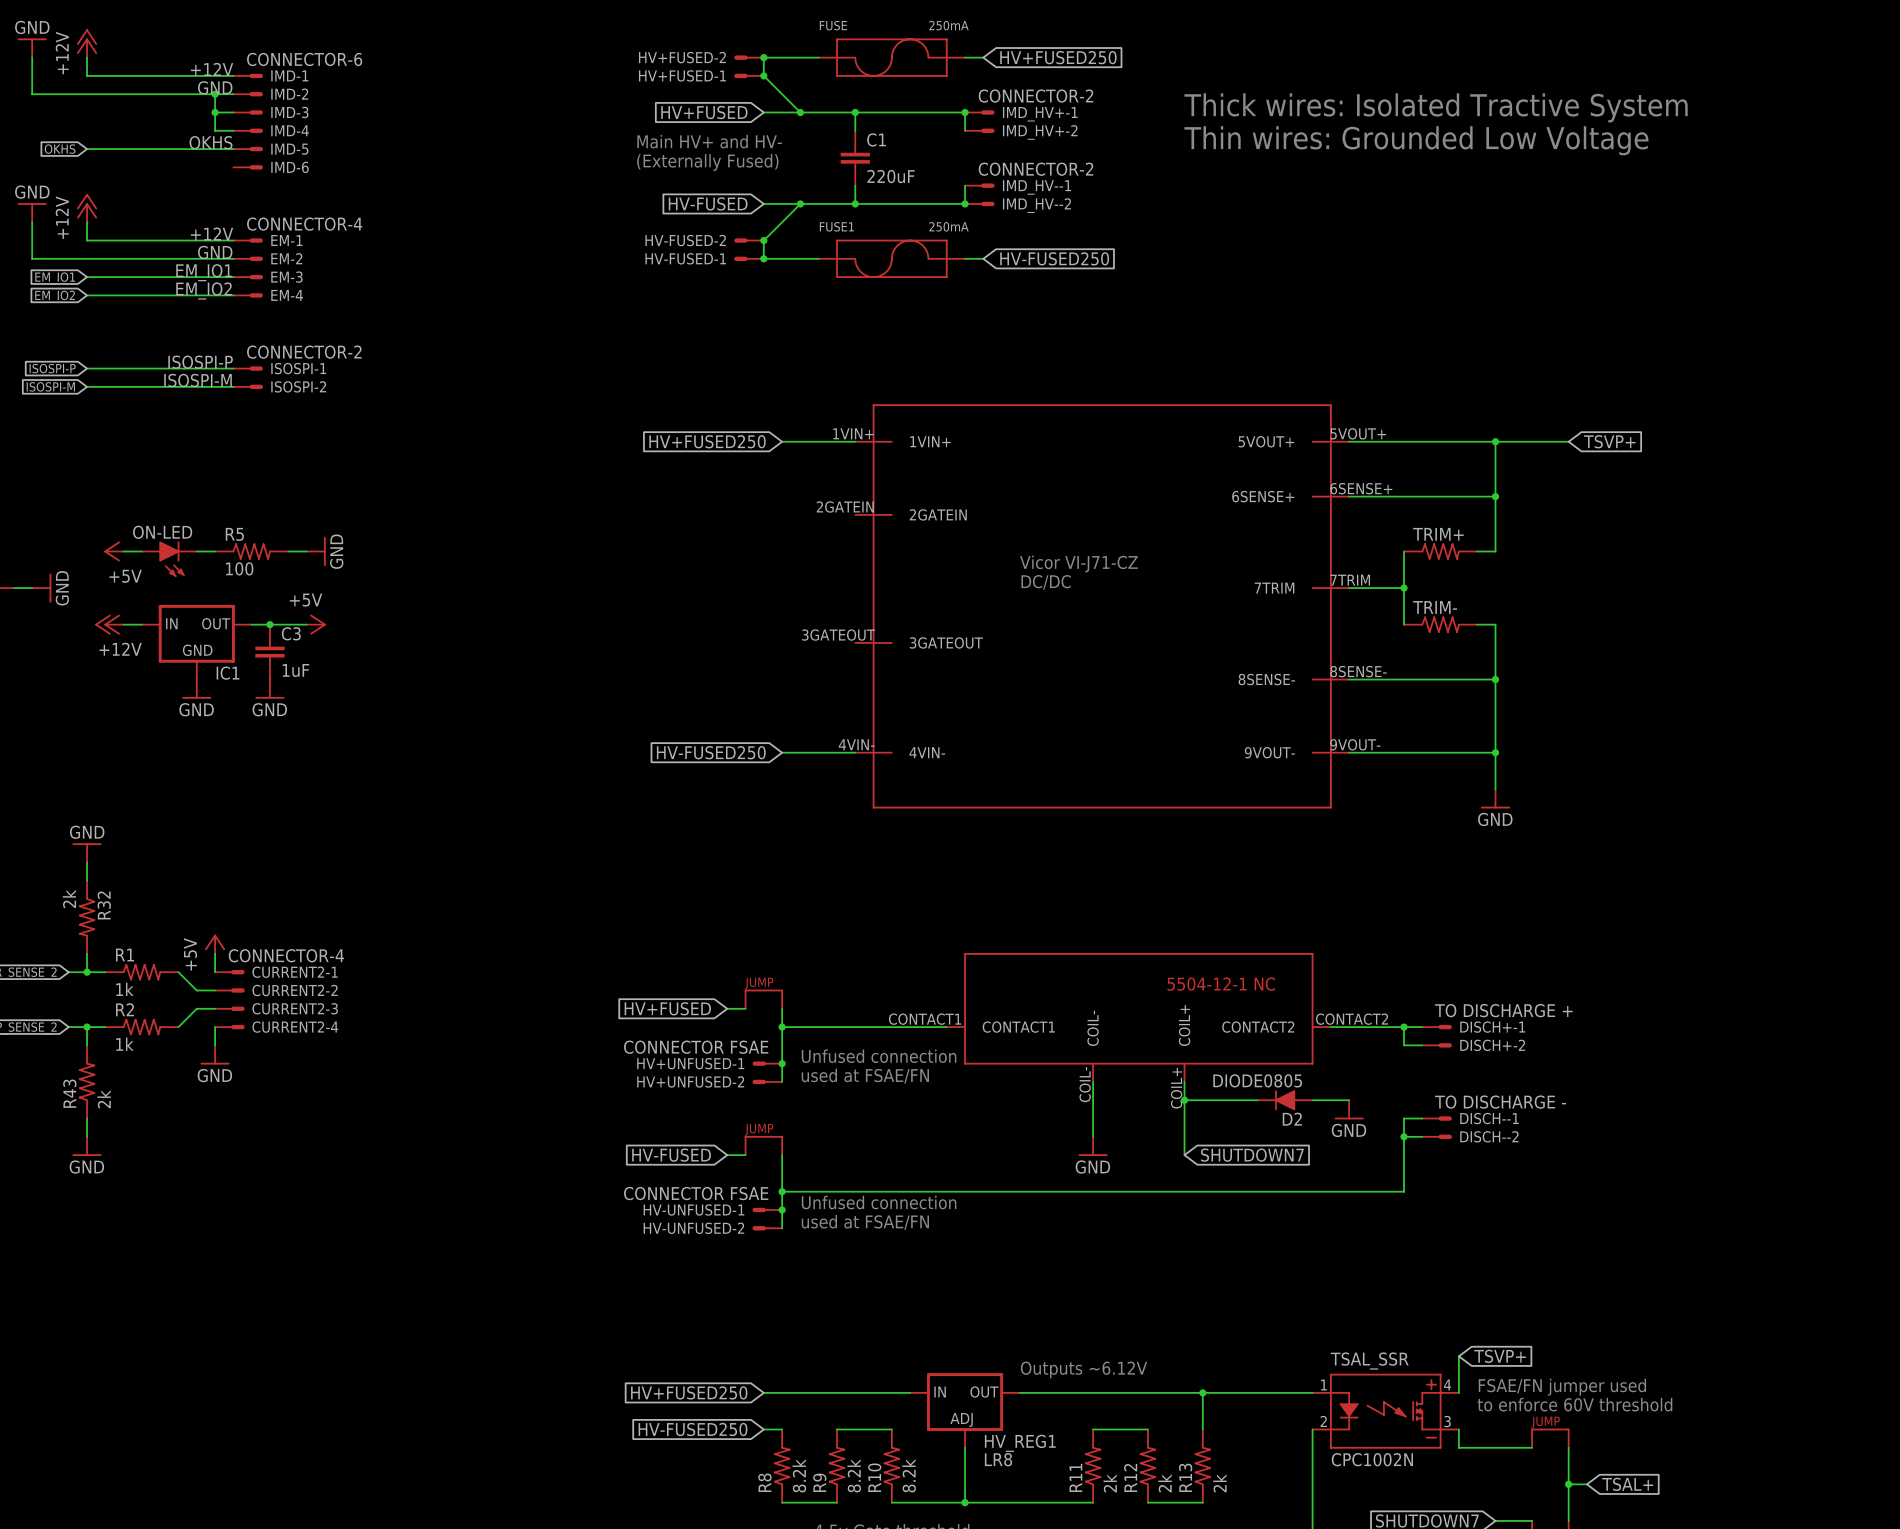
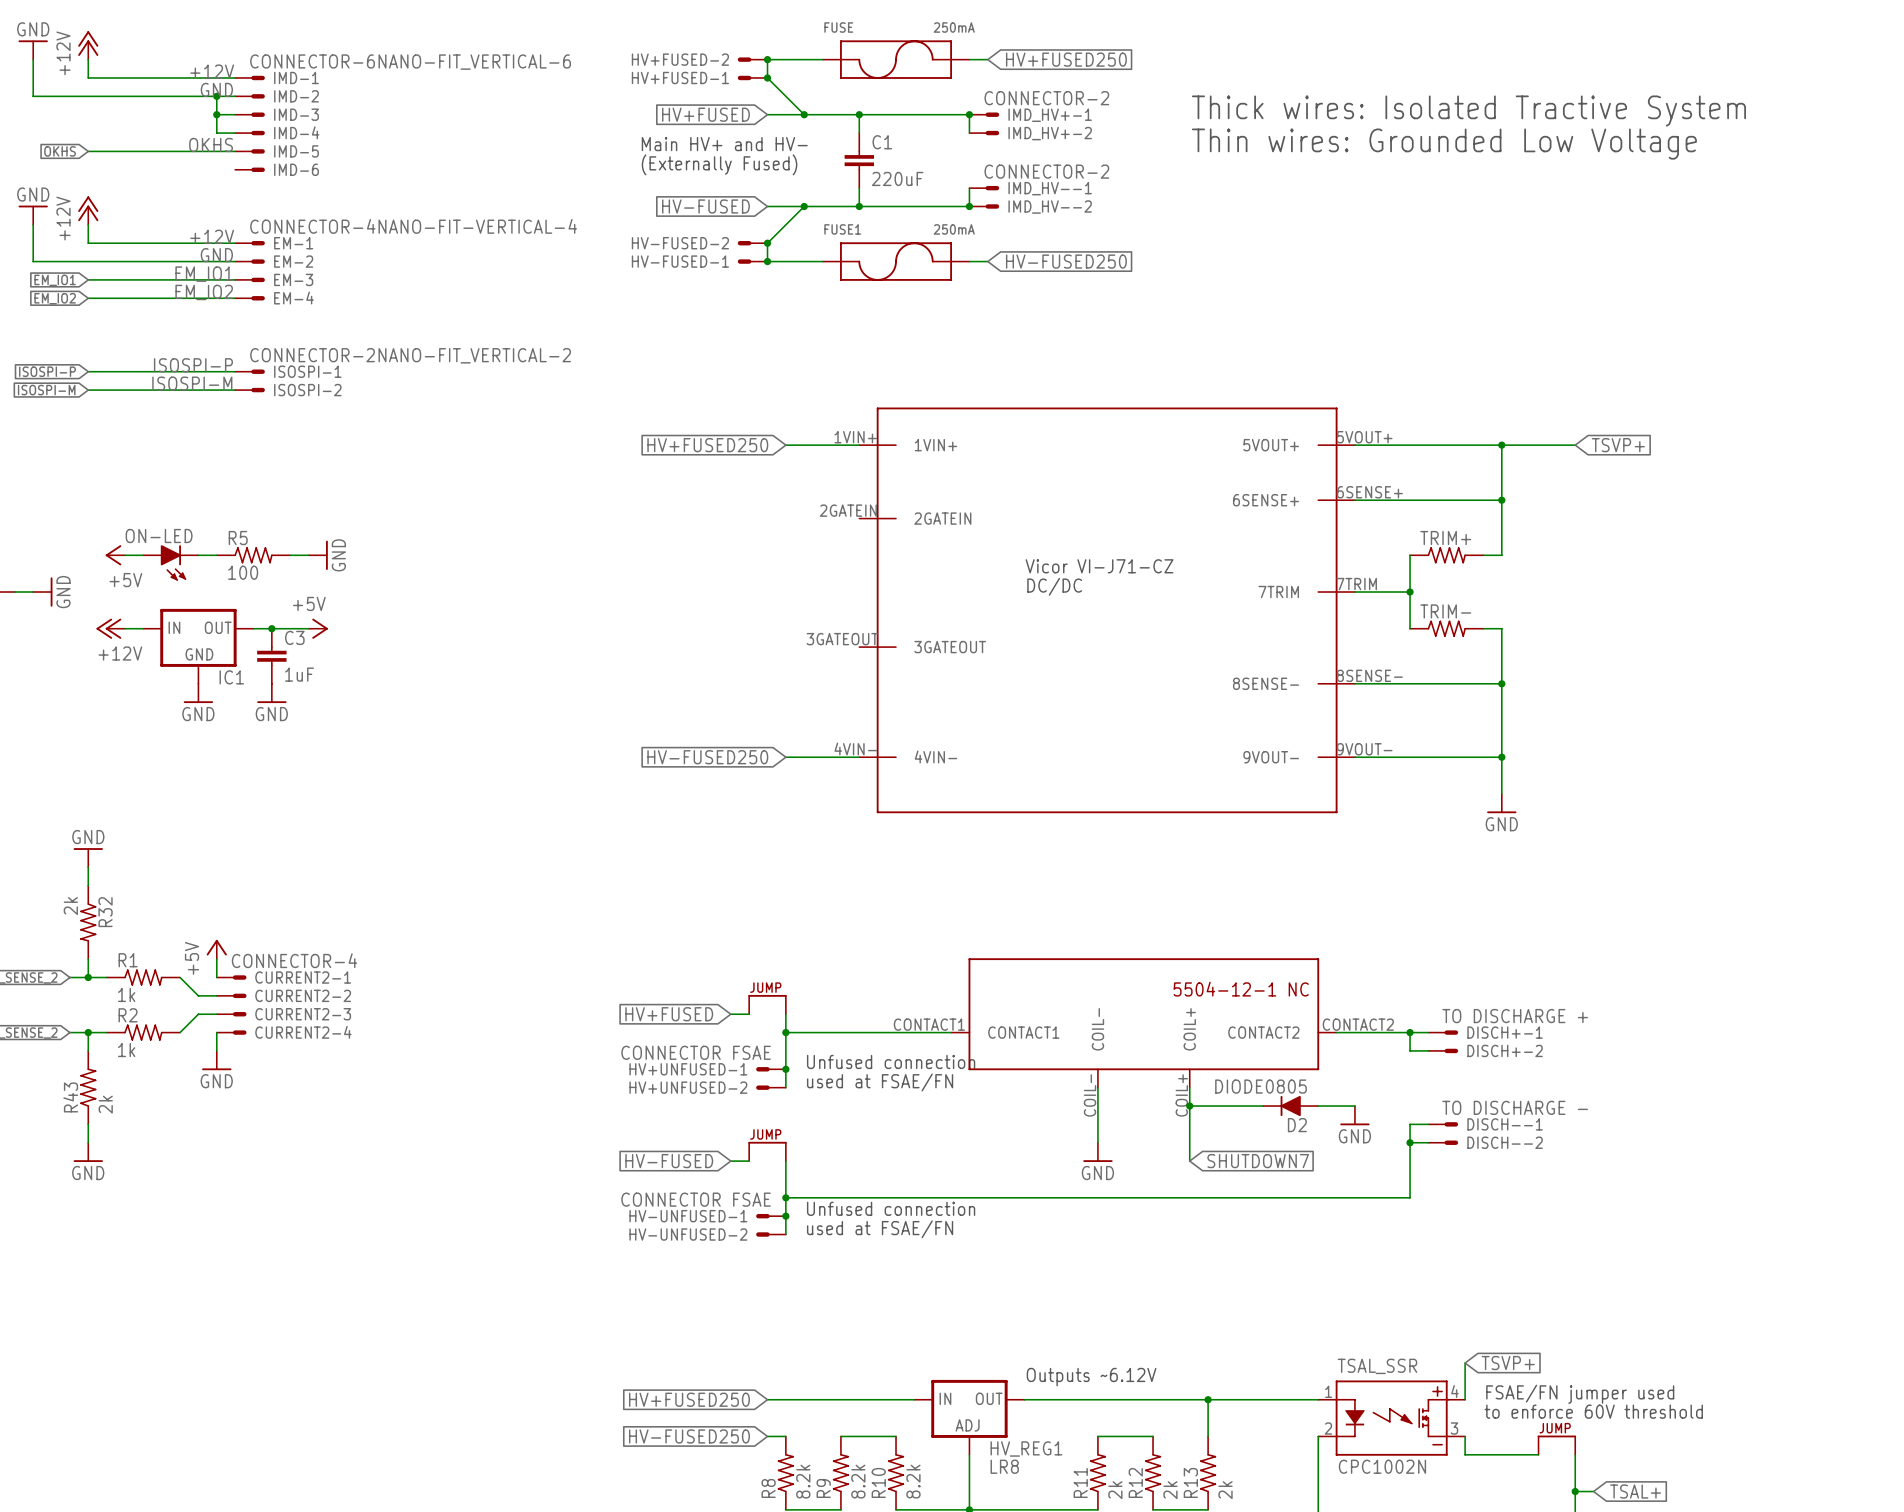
IMD-1 value: CONNECTOR-6 (304, 59) -> CONNECTOR-6NANO-FIT_VERTICAL-6 (410, 62)
EM-1 value: CONNECTOR-4 (304, 224) -> CONNECTOR-4NANO-FIT-VERTICAL-4 (413, 226)
ISOSPI-1 value: CONNECTOR-2 (304, 352) -> CONNECTOR-2NANO-FIT_VERTICAL-2 (410, 355)

